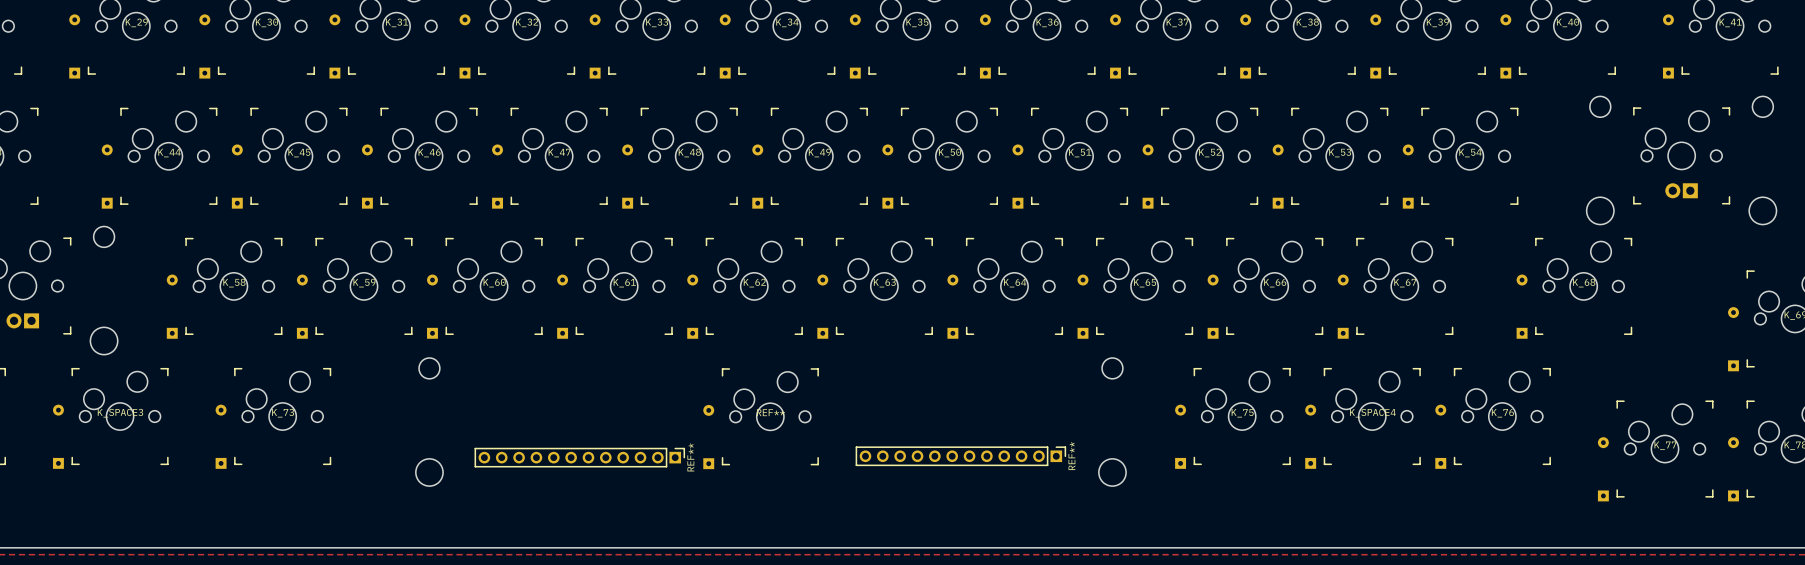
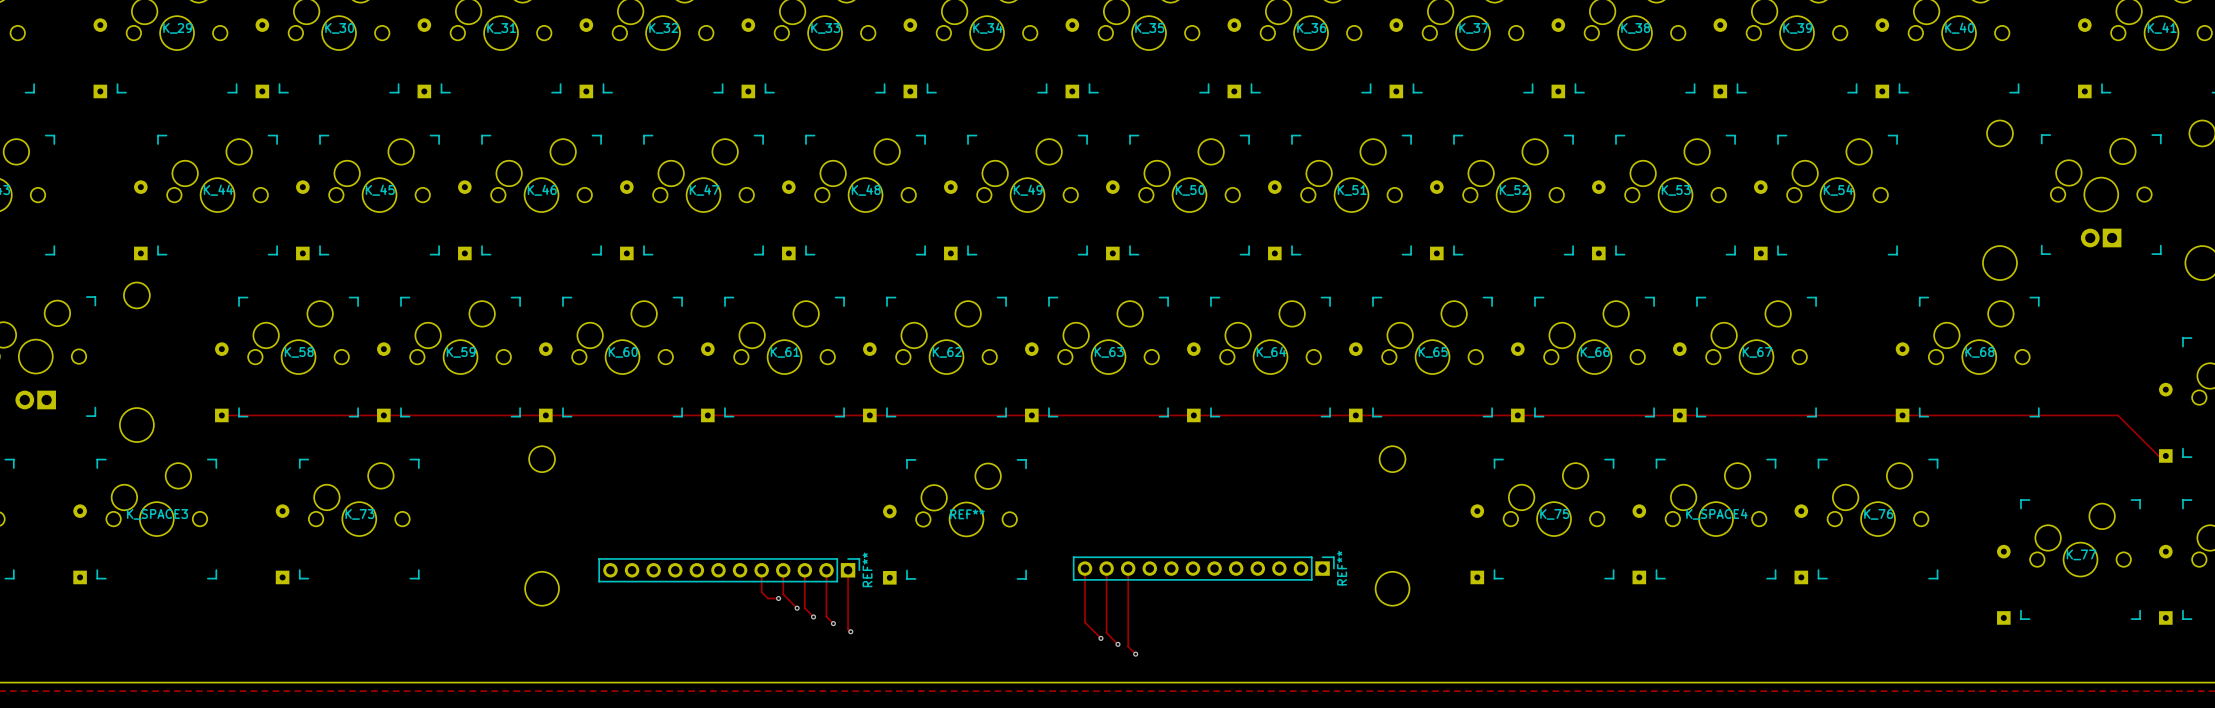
track: none -> (221, 415) (2118, 415) (2158, 455) (2165, 455)
track: none -> (1084, 568) (1084, 622) (1100, 638)
track: none -> (1106, 568) (1106, 632) (1117, 644)
track: none -> (1128, 568) (1128, 646) (1135, 654)
track: none -> (761, 570) (761, 592) (767, 598) (778, 598)
track: none -> (783, 570) (783, 594) (797, 608)
track: none -> (804, 570) (804, 608) (813, 616)
track: none -> (826, 570) (826, 616) (833, 623)
track: none -> (848, 570) (848, 629) (850, 631)
via: none -> (778, 598)
via: none -> (797, 608)
via: none -> (813, 616)
via: none -> (833, 623)
via: none -> (850, 631)
via: none -> (1100, 638)
via: none -> (1117, 644)
via: none -> (1135, 654)

